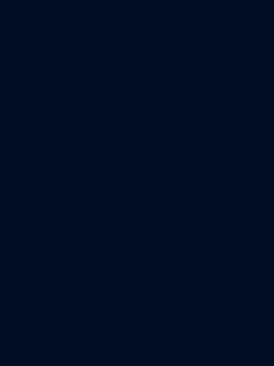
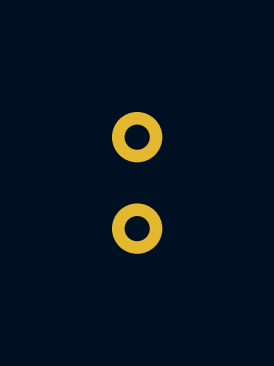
part: none -> (137, 182)

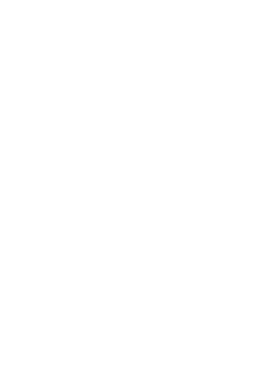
part: (137, 182) -> none

